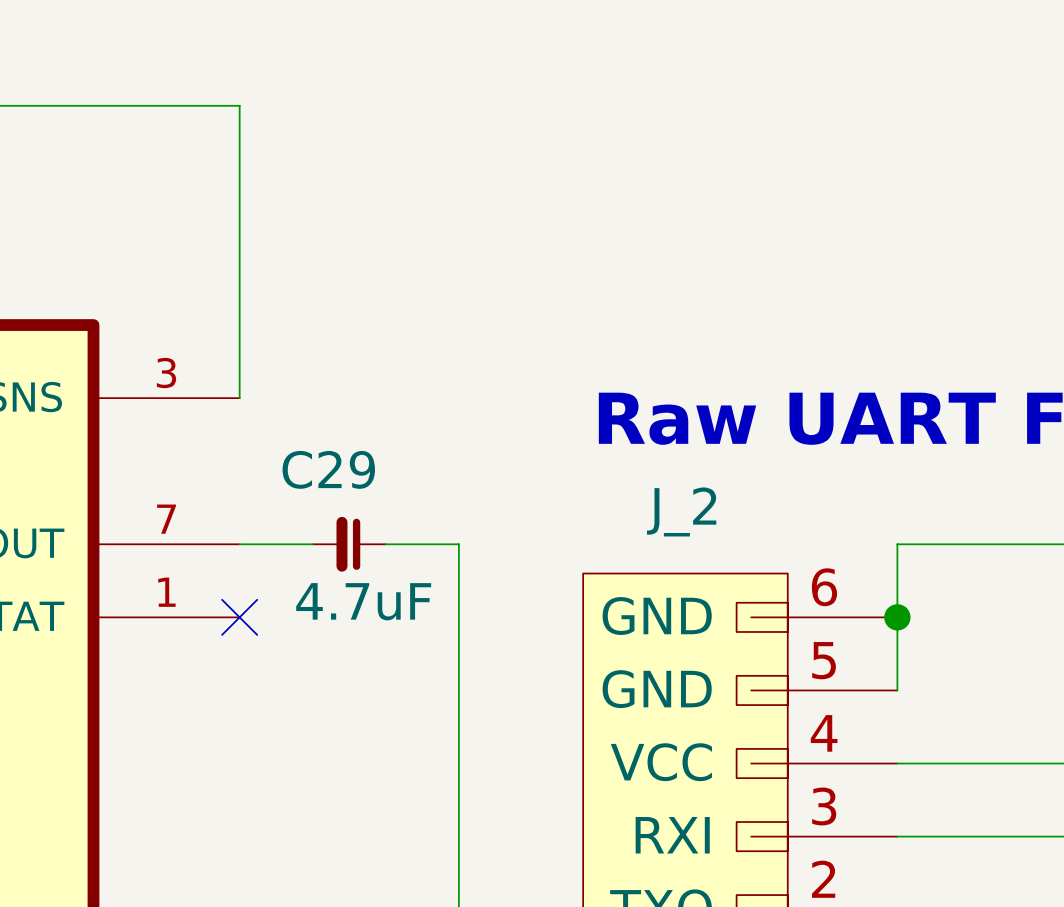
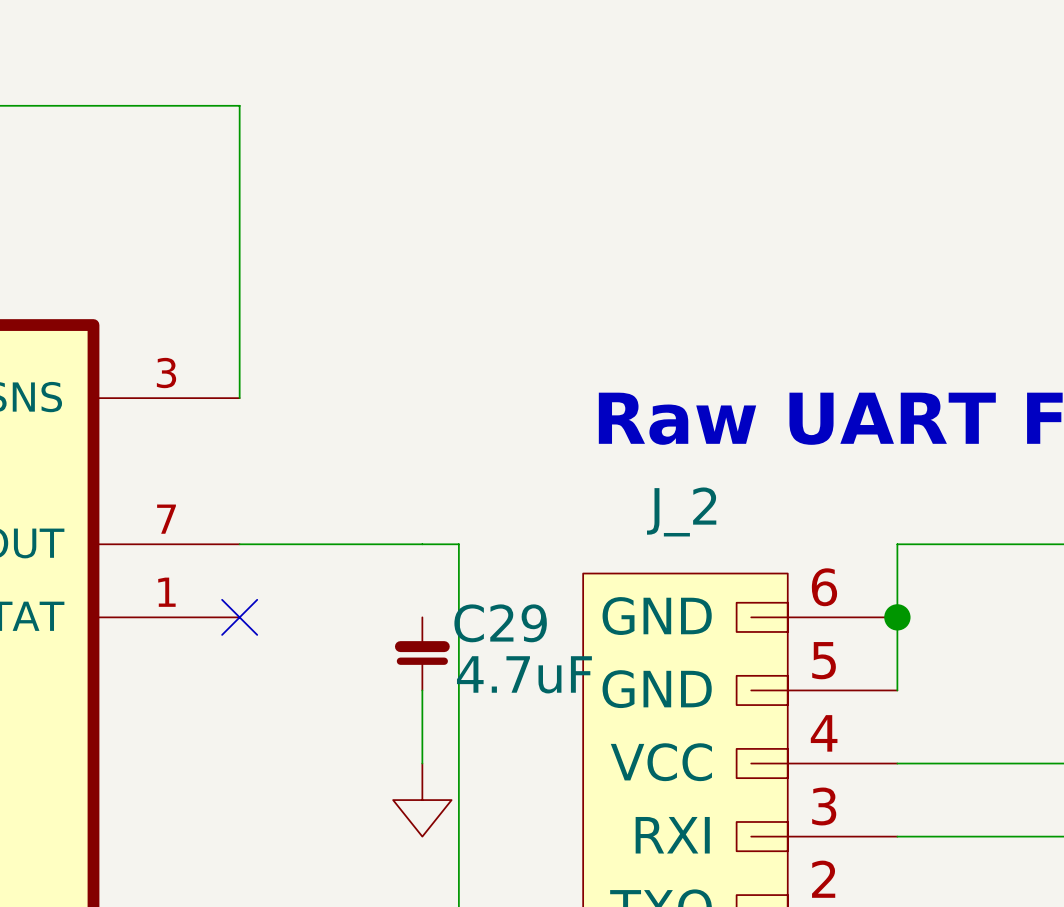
C29 position: (349, 544) -> (422, 653)
C29 rotation: 0° (357, 544) -> 90° clockwise (422, 662)
C29 value position: 4.7uF (363, 601) -> 4.7uF (524, 674)
wire: none -> (422, 690) (422, 763)
power symbol: none -> (422, 800)

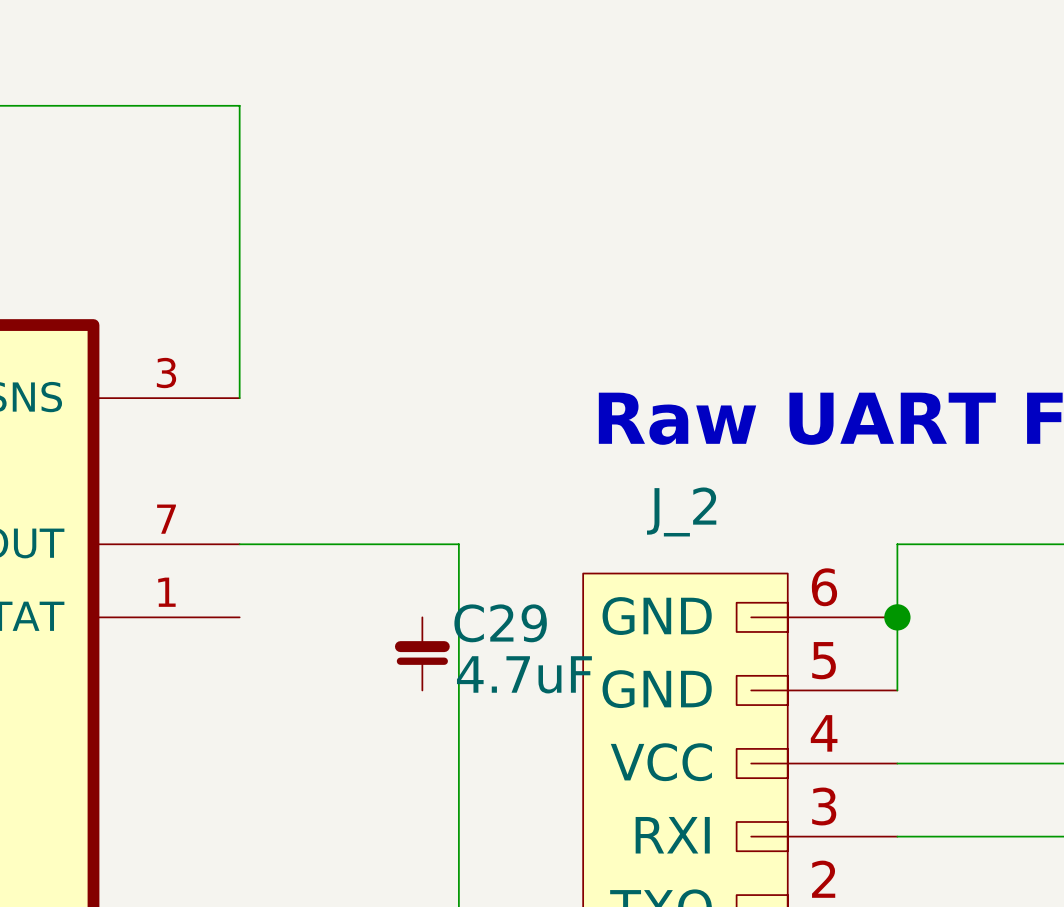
no-connect mark: (239, 617) -> none
wire: (422, 690) (422, 763) -> none
power symbol: (422, 800) -> none

